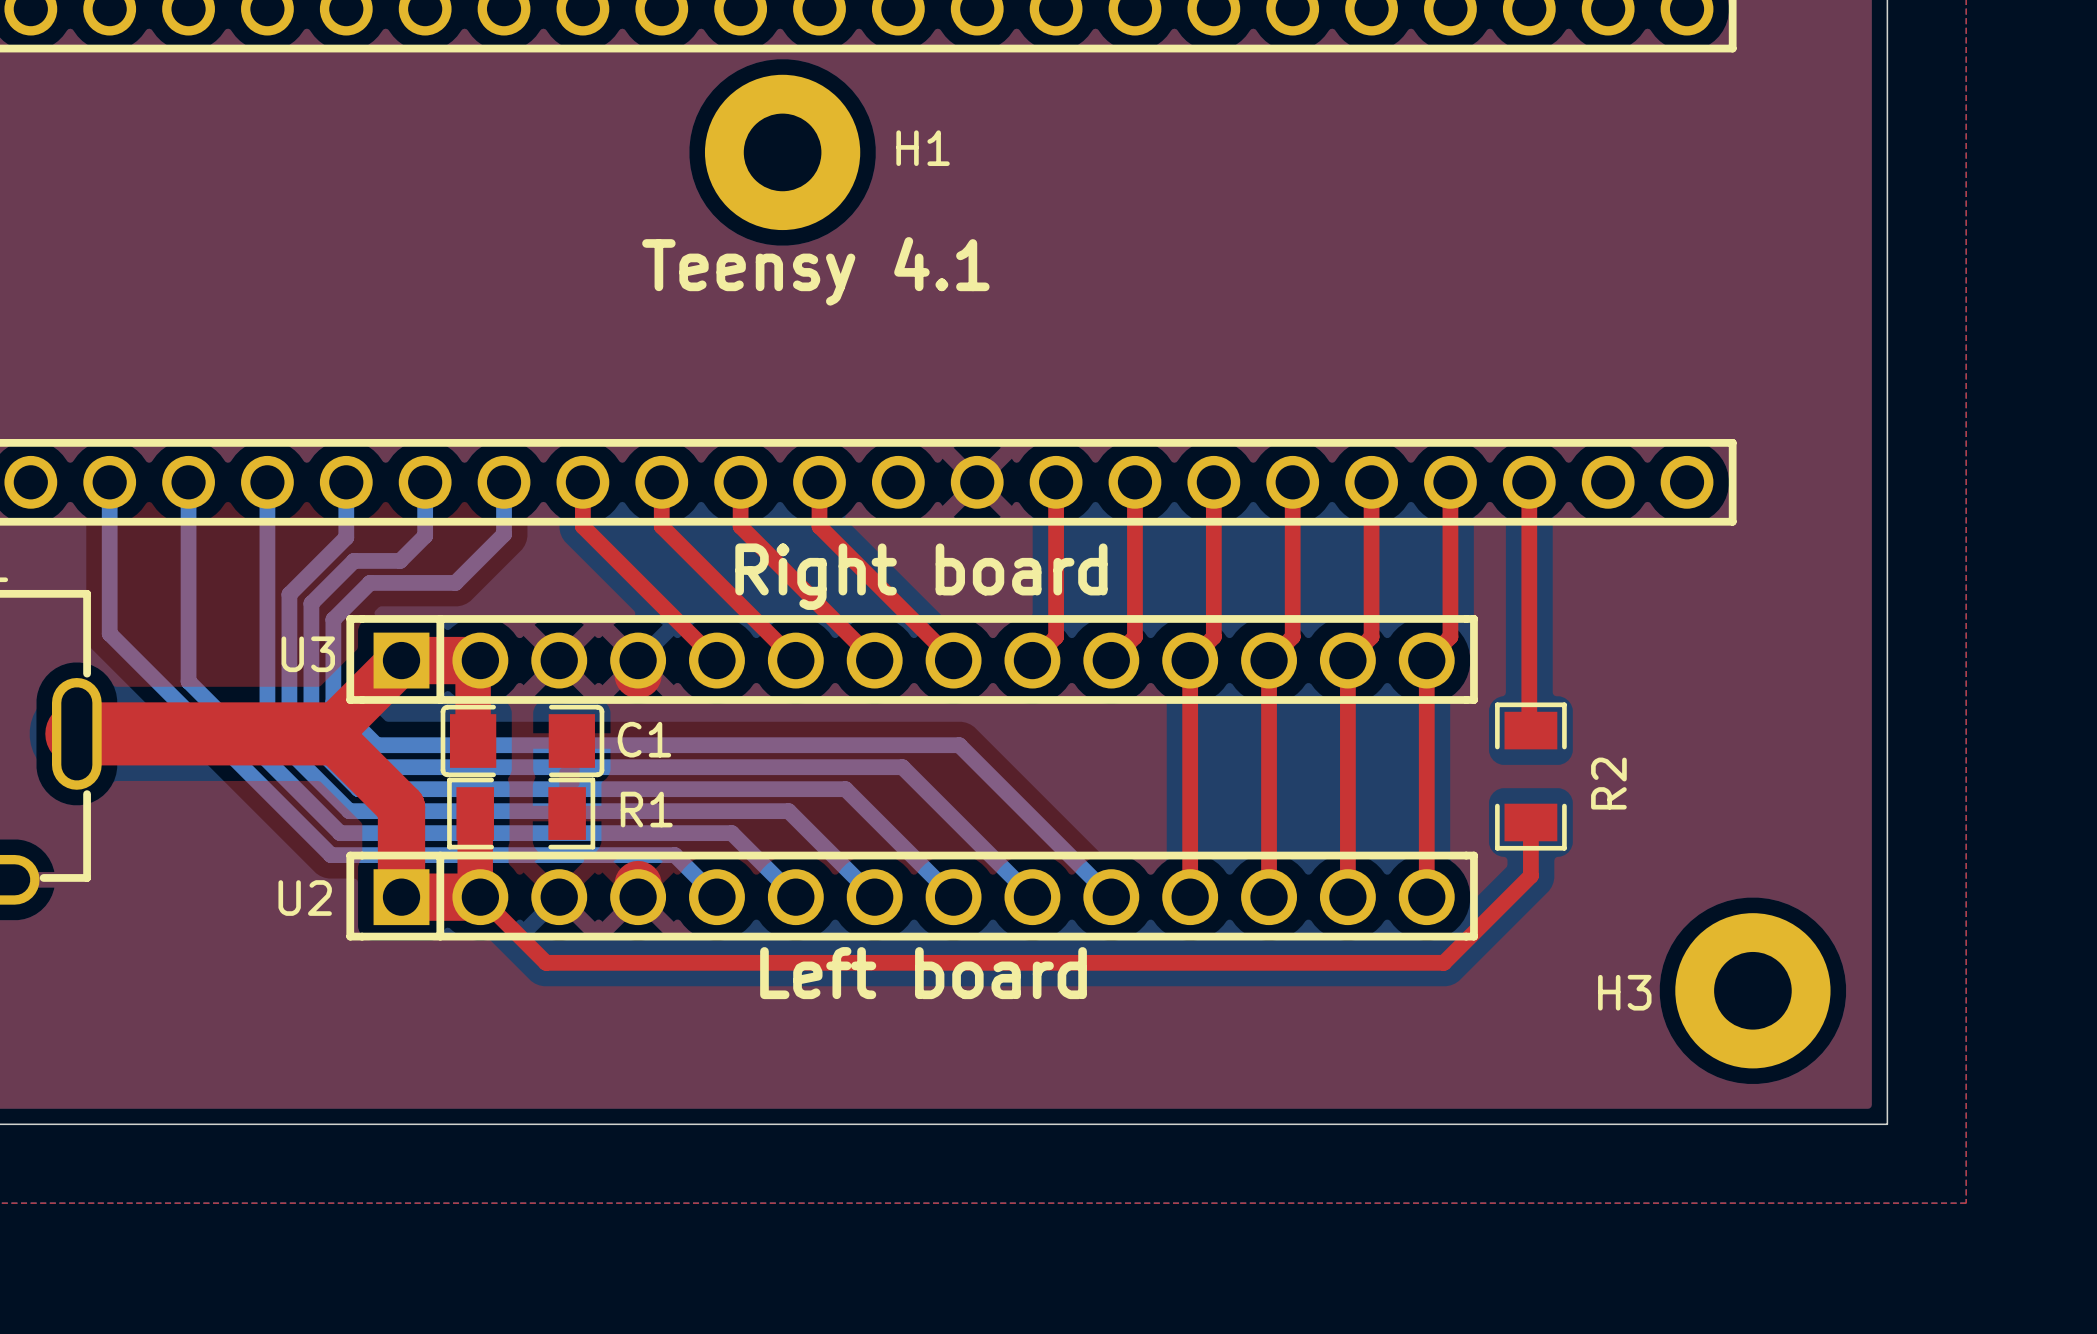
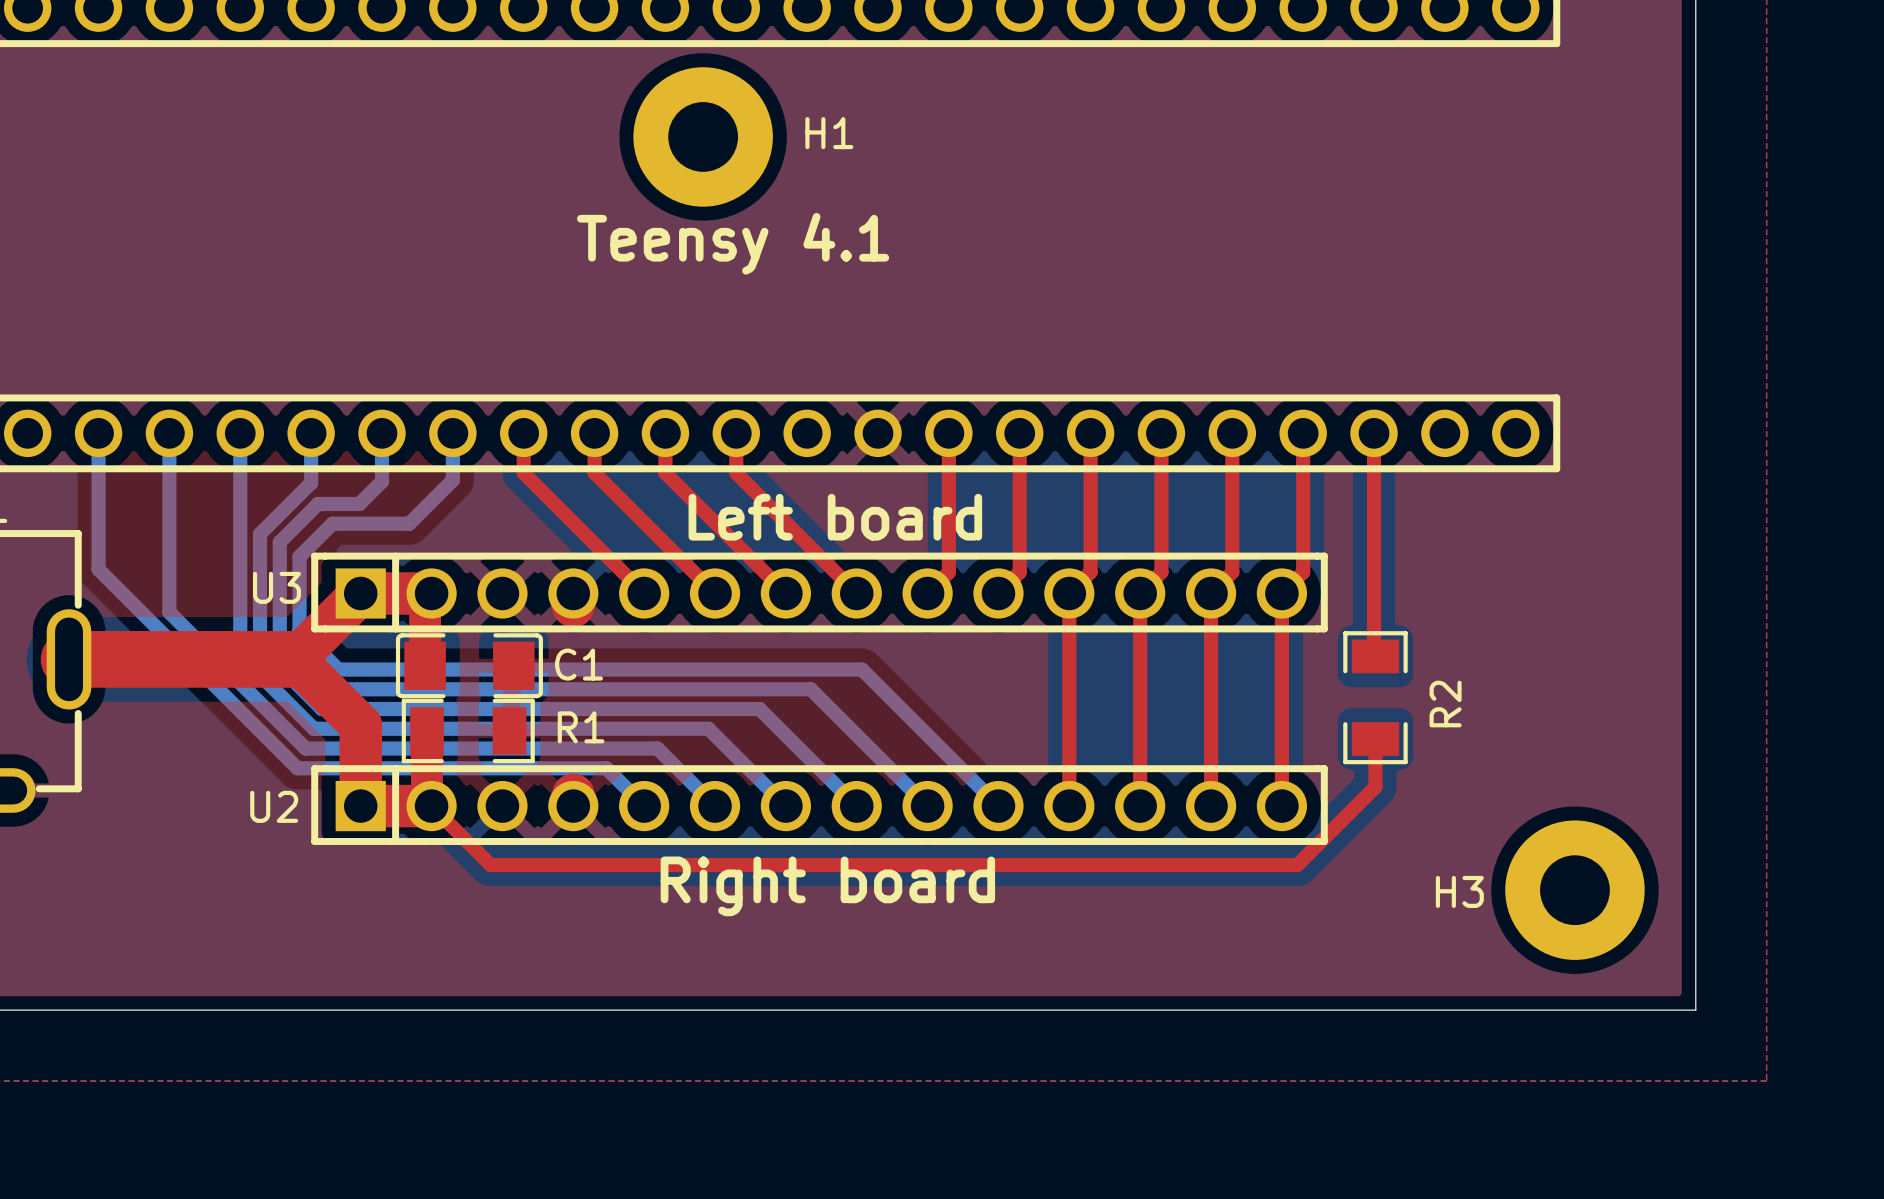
text: Right board (921, 576) -> Left board (835, 517)
text: Left board (923, 973) -> Right board (827, 886)

